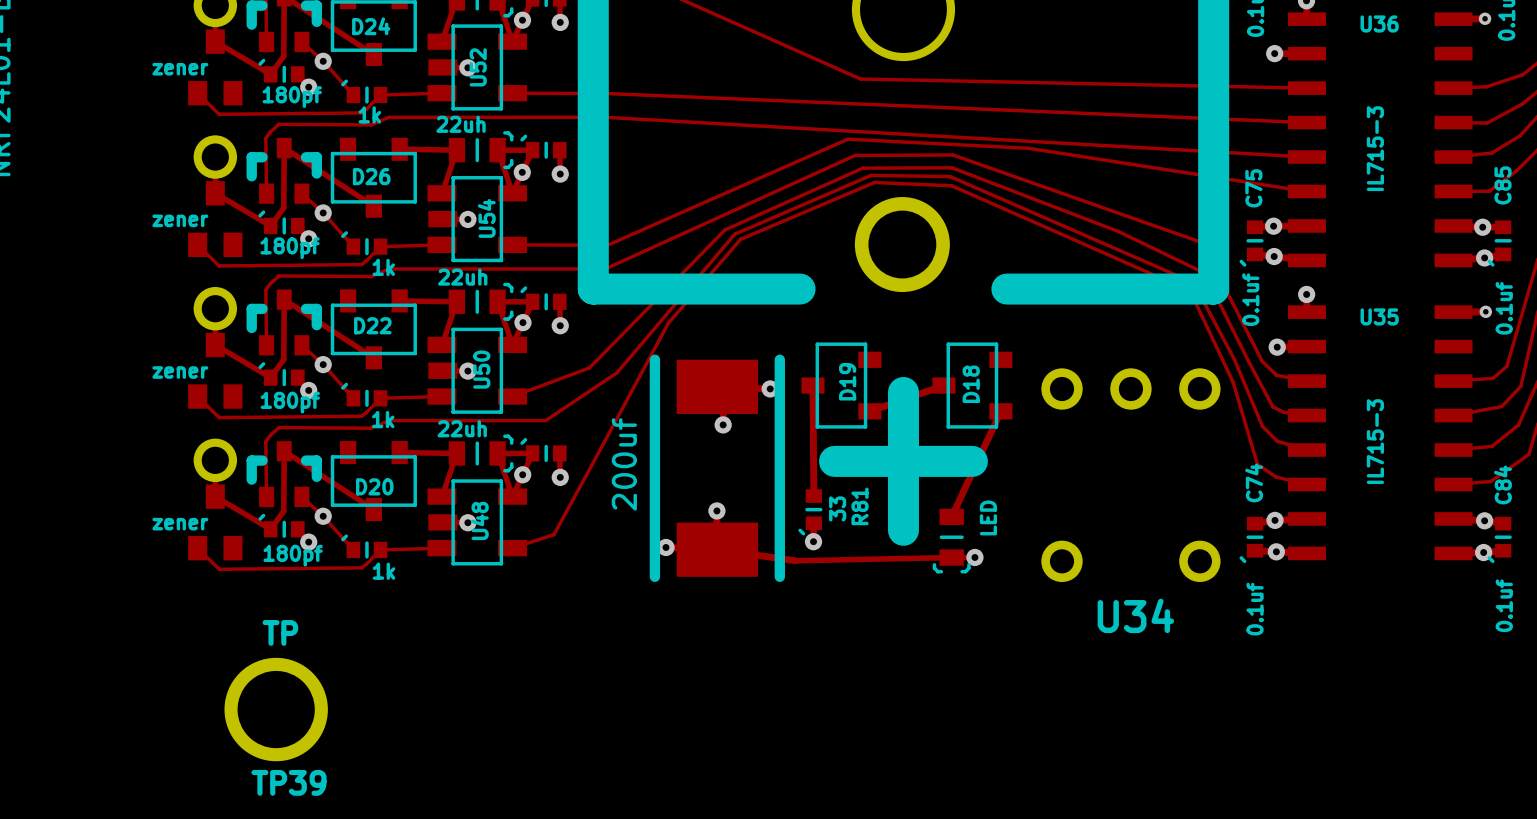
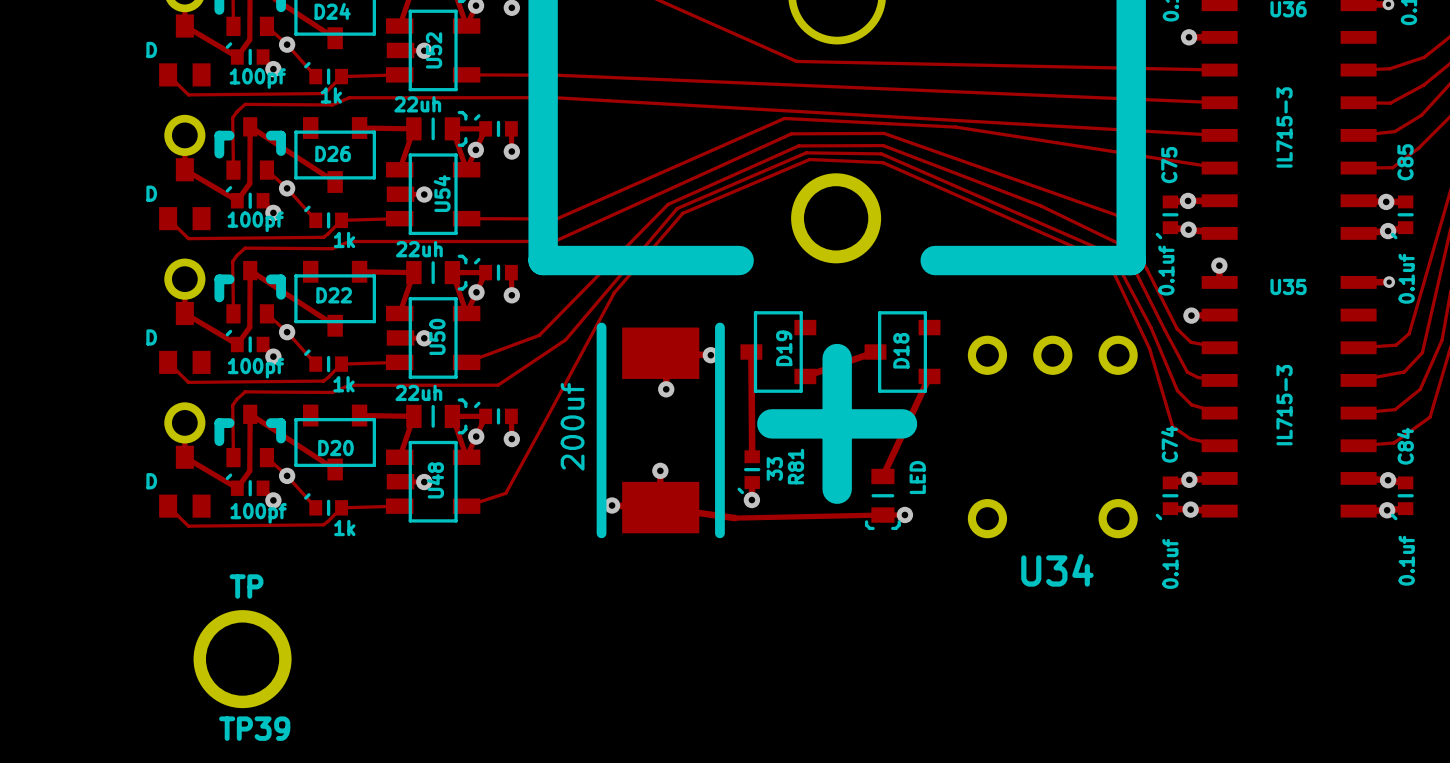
part value: zener (180, 69) -> D (151, 49)
part value: 180pf (292, 97) -> 100pf (257, 78)
part value: zener (180, 220) -> D (151, 193)
part value: 180pf (290, 248) -> 100pf (255, 221)
part value: zener (180, 372) -> D (151, 337)
part value: 180pf (290, 402) -> 100pf (255, 368)
part value: zener (180, 524) -> D (151, 481)
part value: 180pf (293, 555) -> 100pf (258, 513)

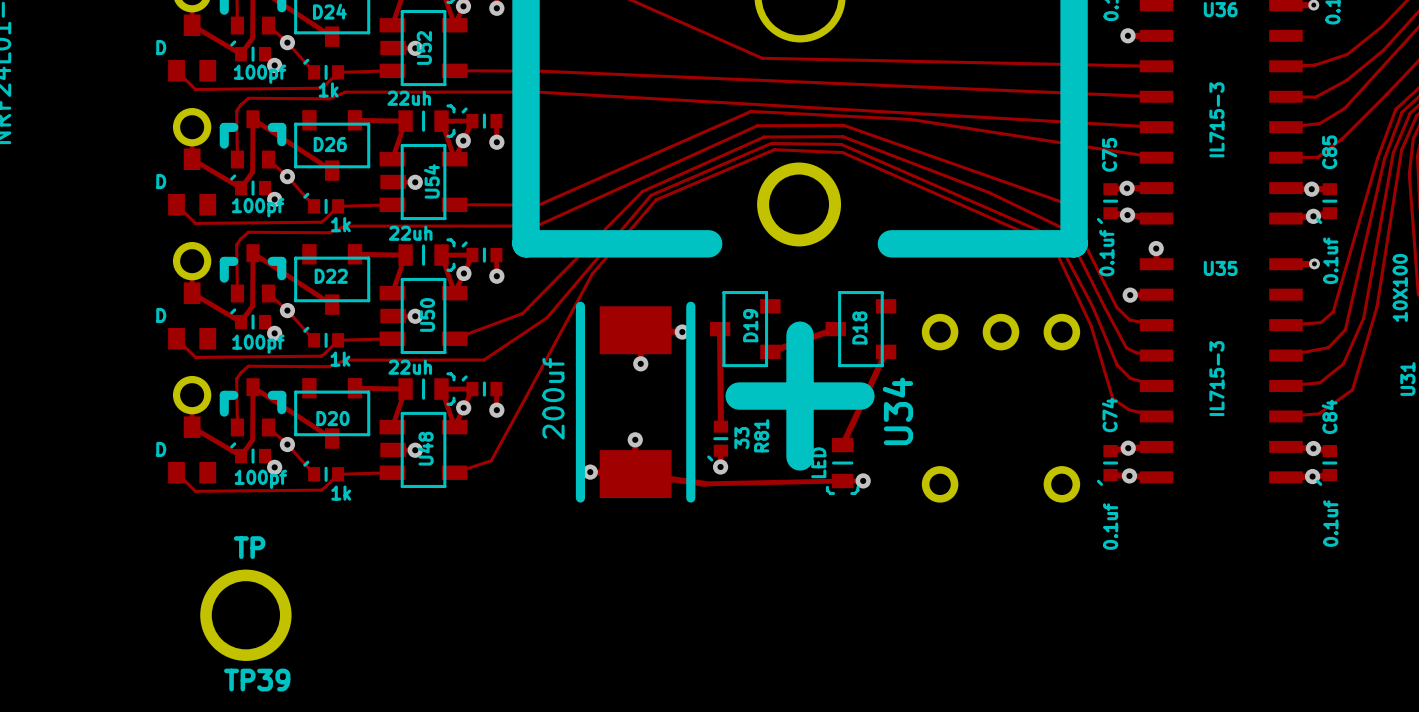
part value position: LED (917, 477) -> LED (818, 462)
U34 name rotation: 0° (1057, 570) -> 90° counterclockwise (897, 411)
U34 name position: U34 (1057, 570) -> U34 (897, 411)

